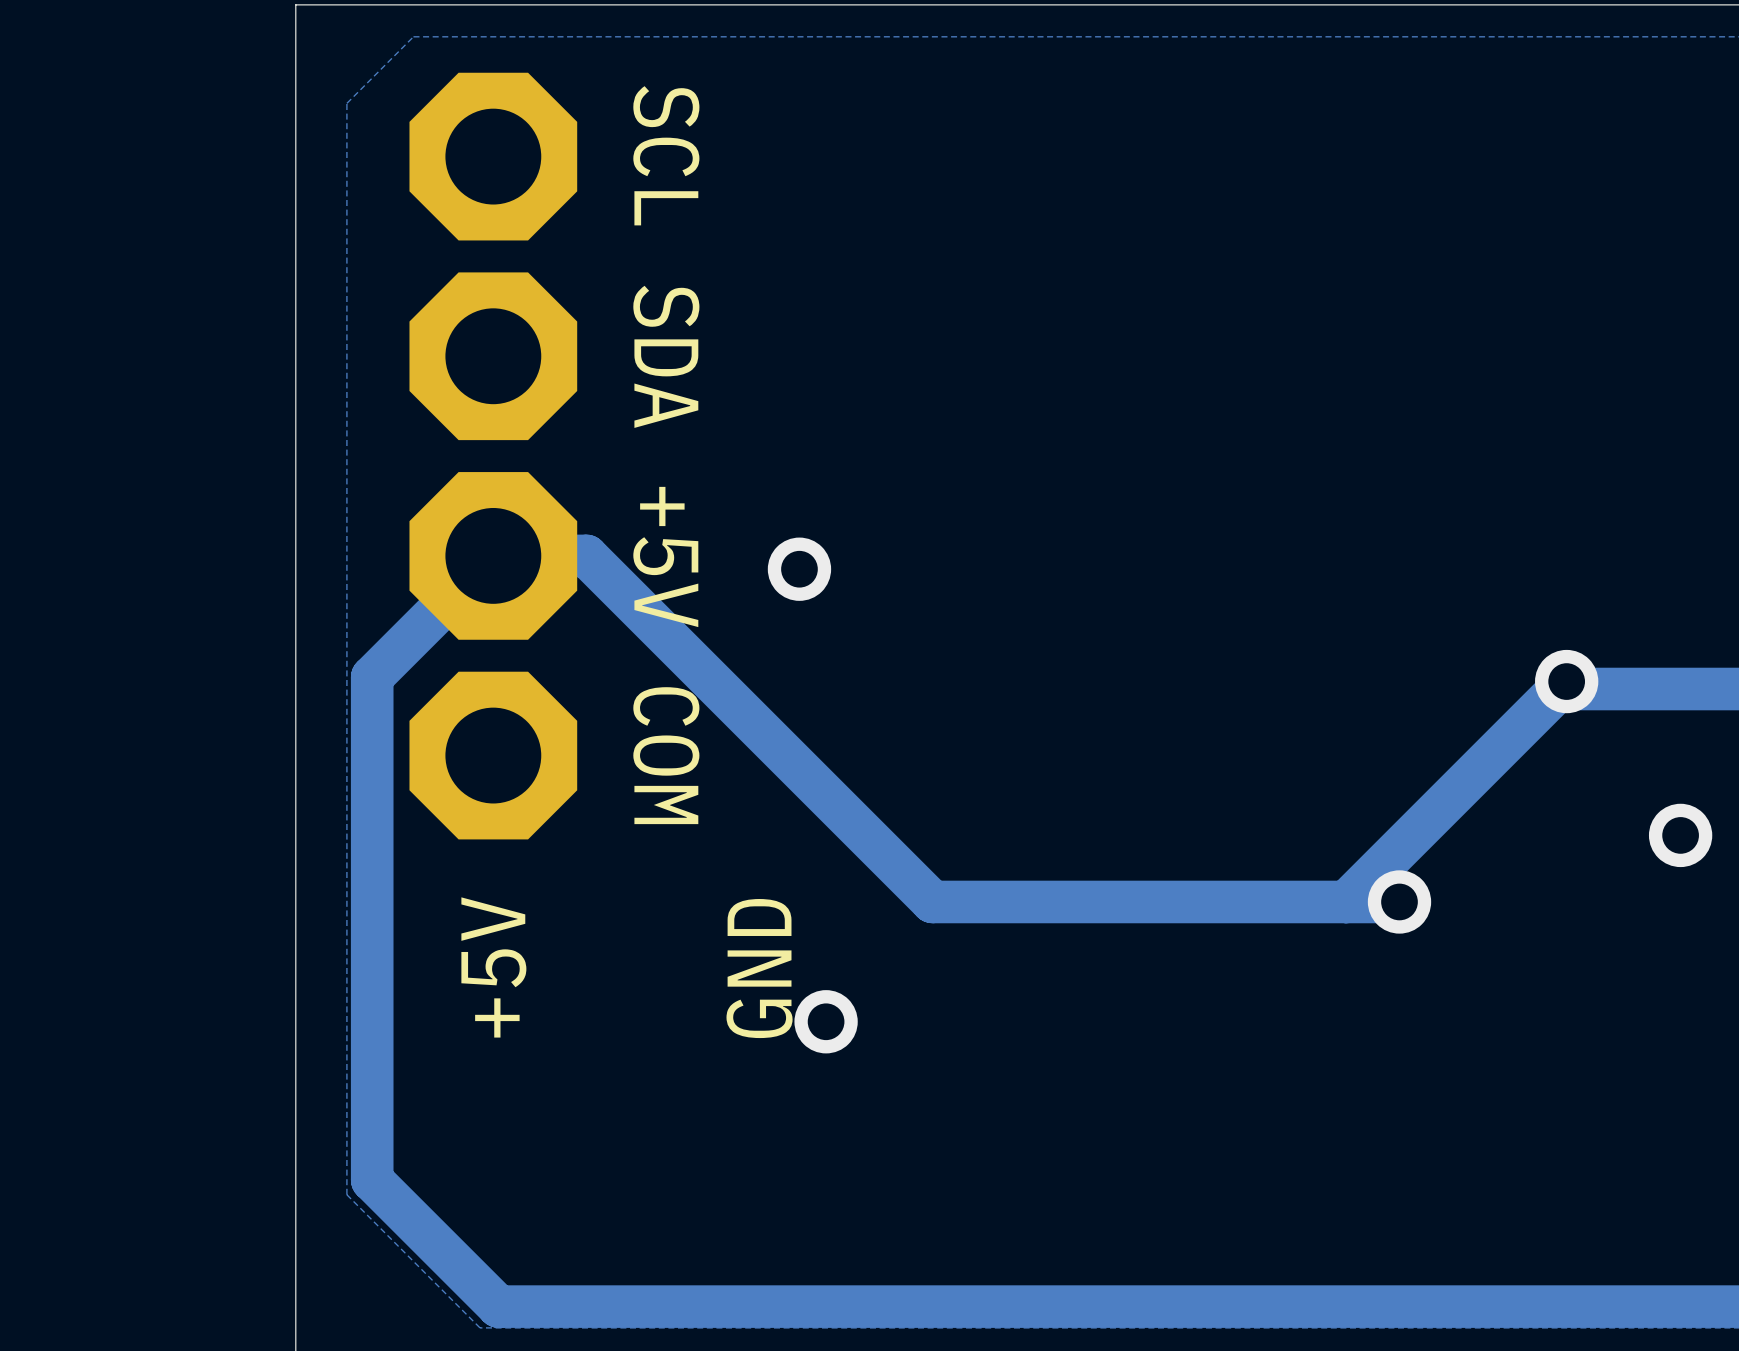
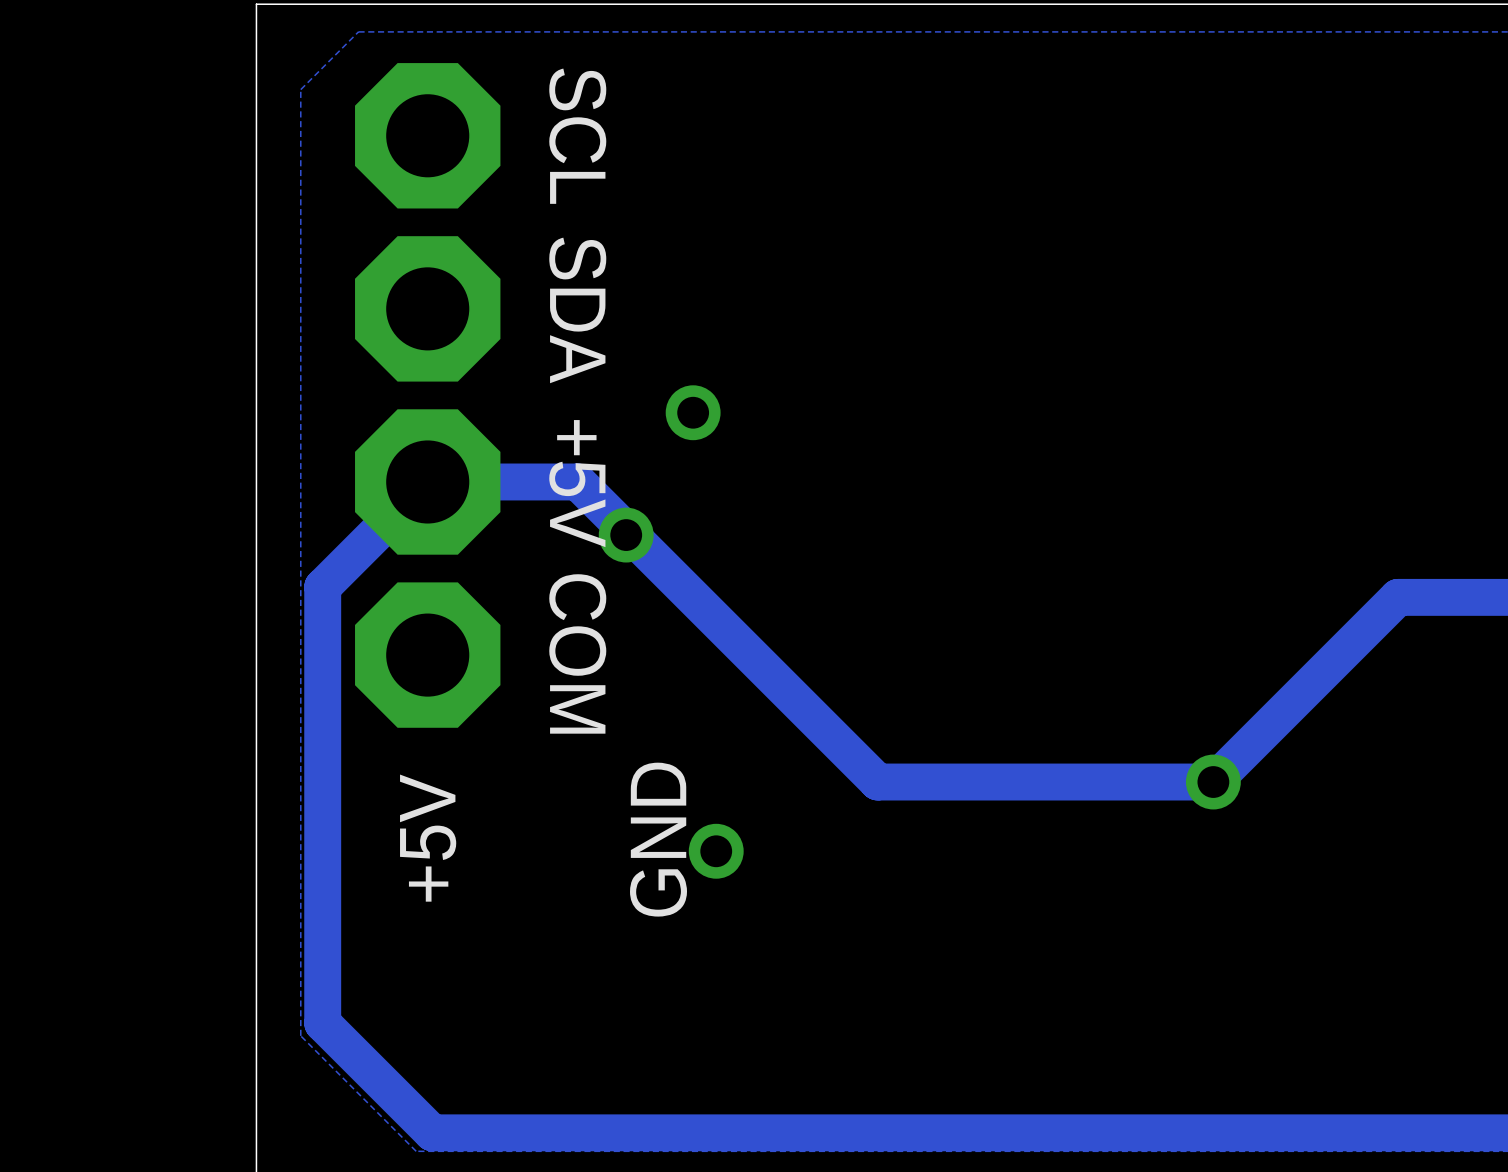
via: none -> (693, 412)
track: (586, 555) (932, 901) (1012, 901) -> (508, 481) (577, 481) (877, 782)
via: (799, 569) -> none
via: none -> (626, 535)
via: (1566, 681) -> none
track: (1612, 689) (1574, 689) (1566, 681) (1346, 901) -> (1398, 597) (1213, 782)
via: (1680, 835) -> none
via position: (826, 1021) -> (716, 851)

